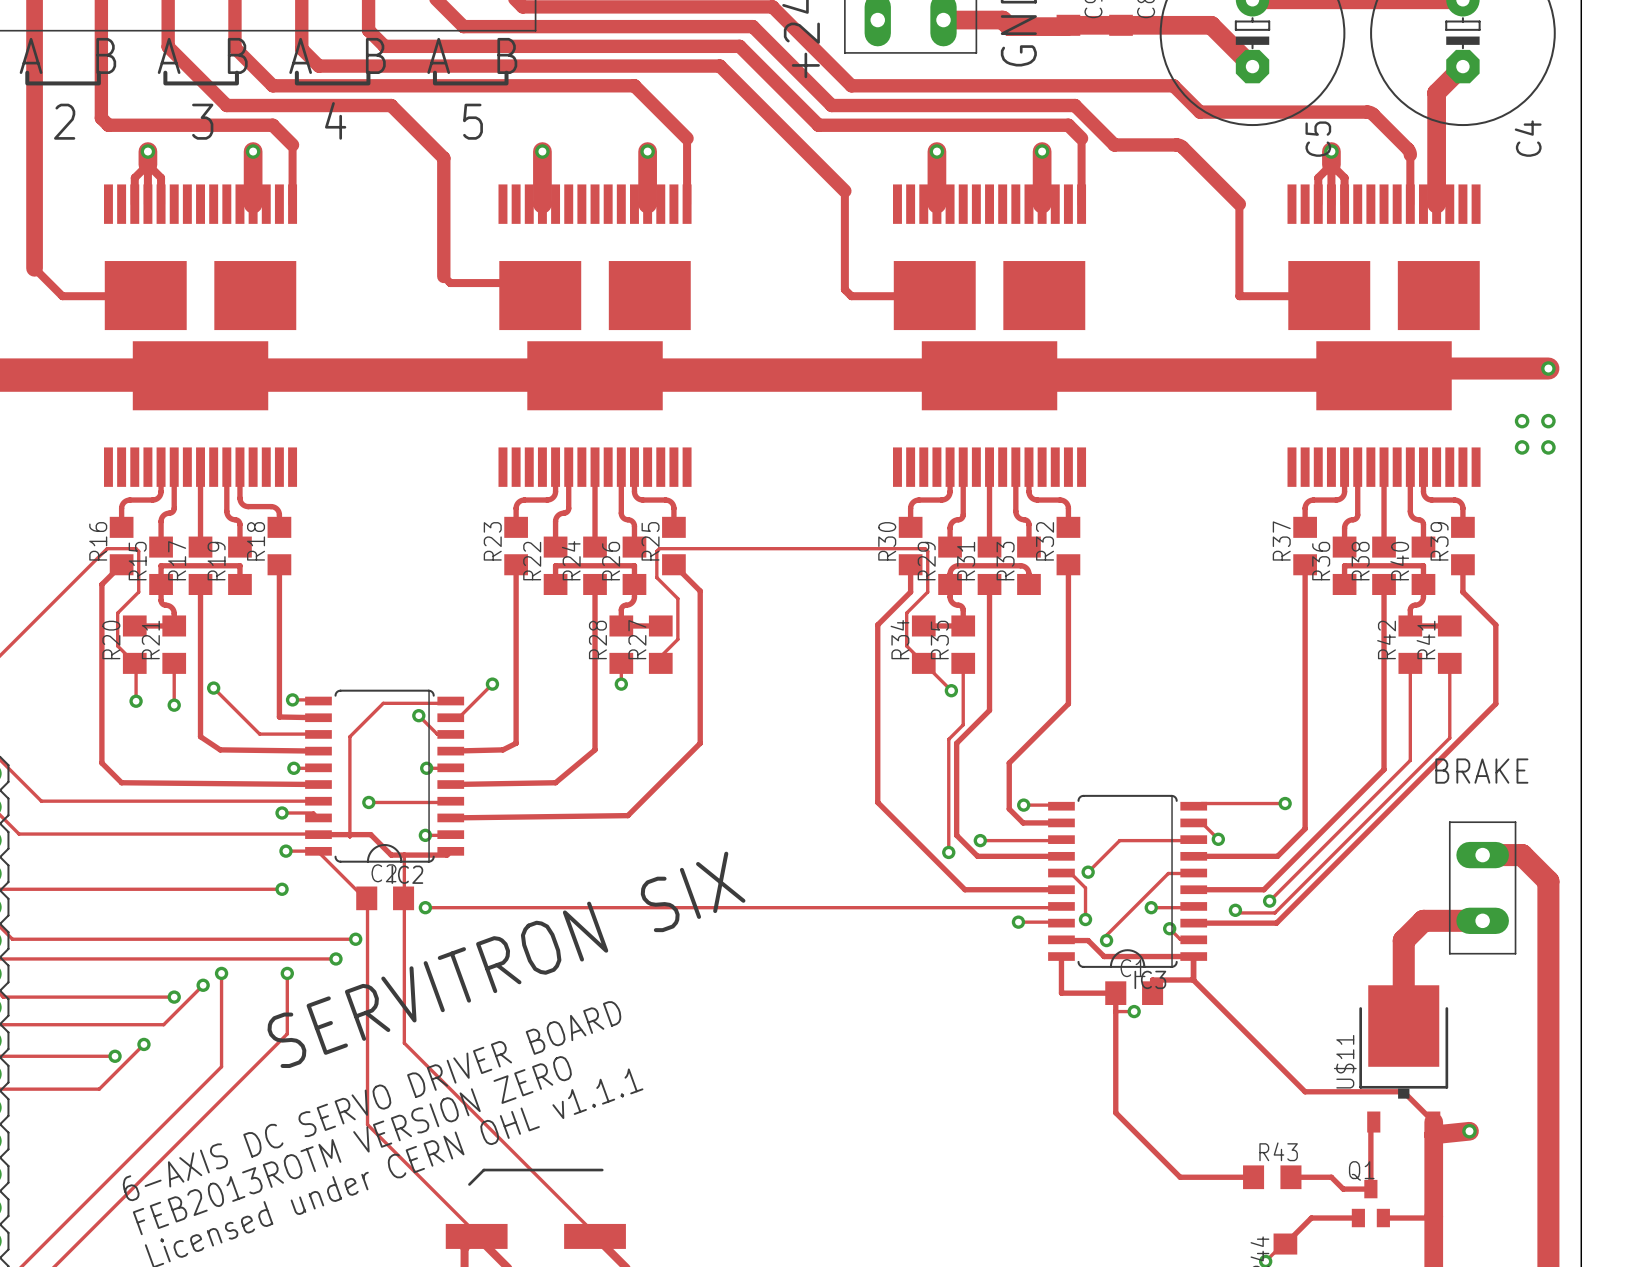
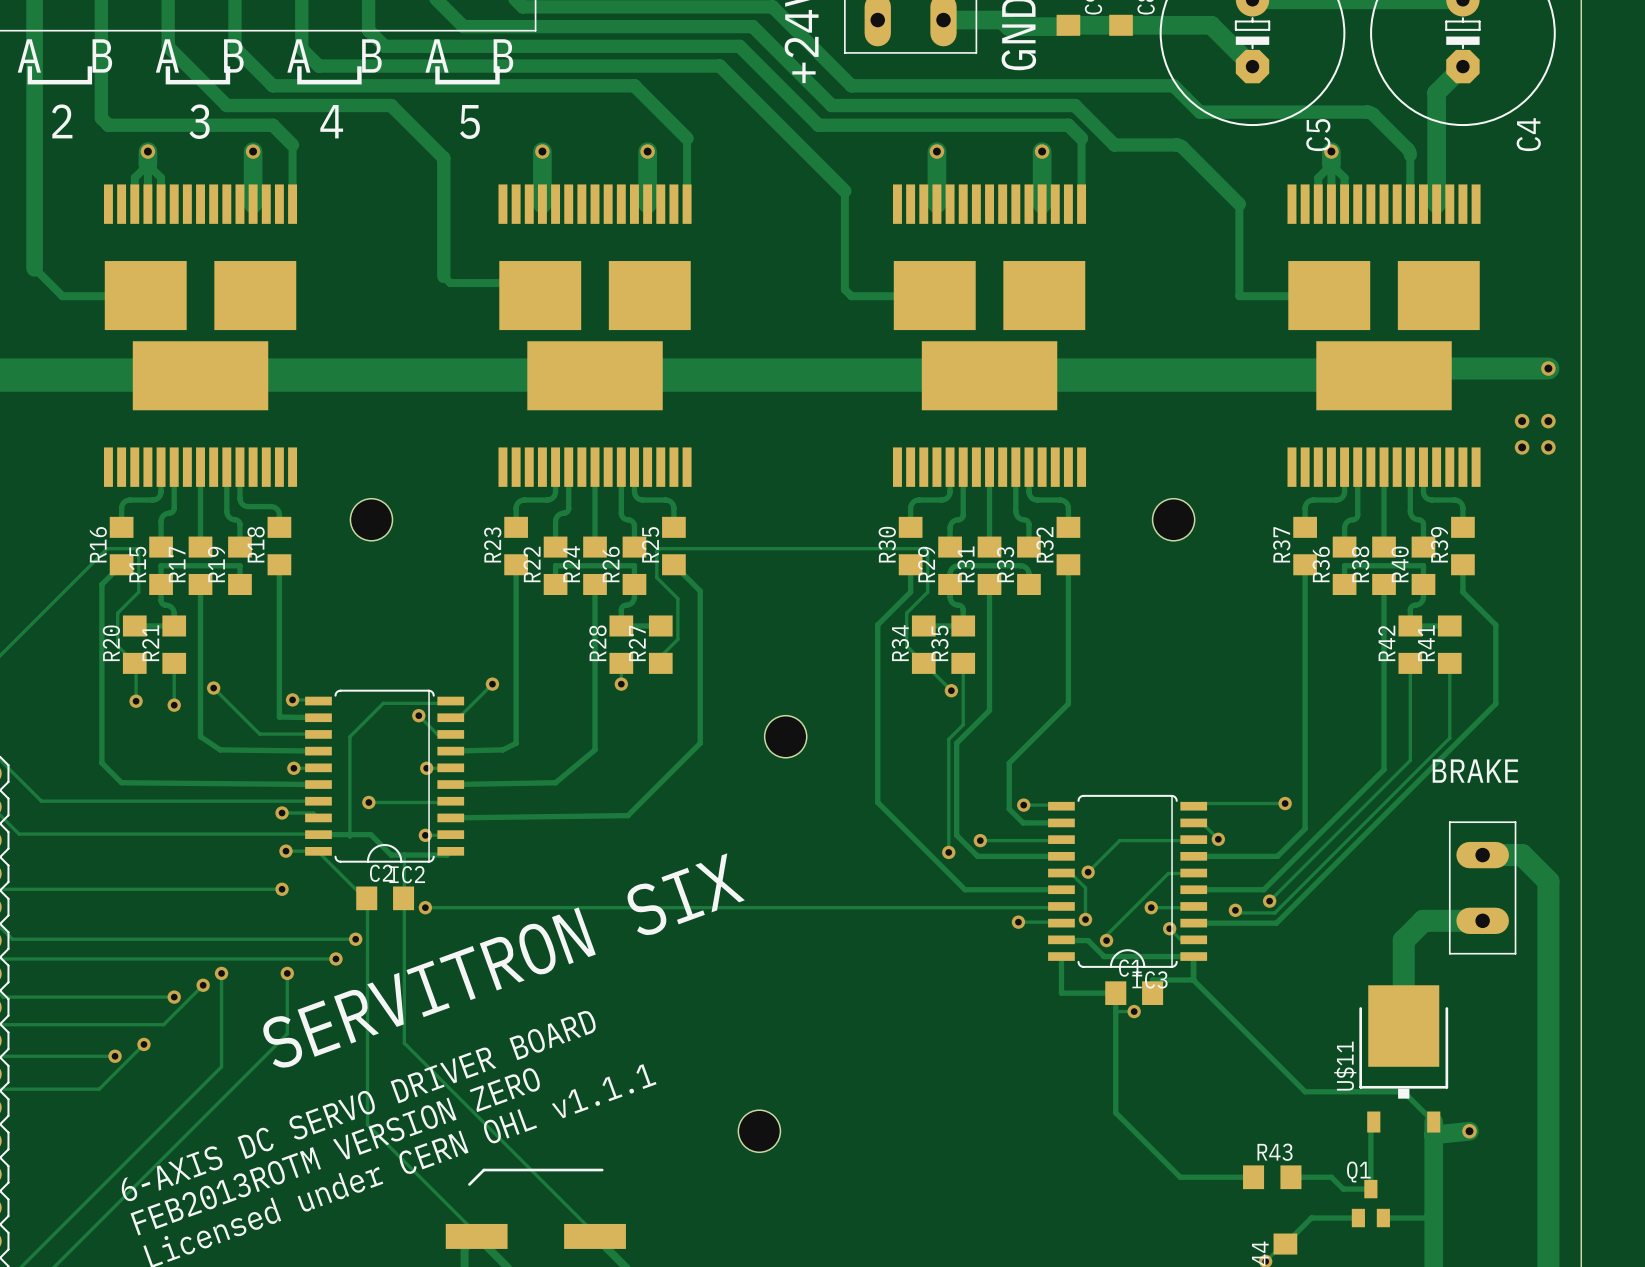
hole: none -> (371, 519)
hole: none -> (1173, 519)
hole: none -> (785, 736)
hole: none -> (759, 1131)

